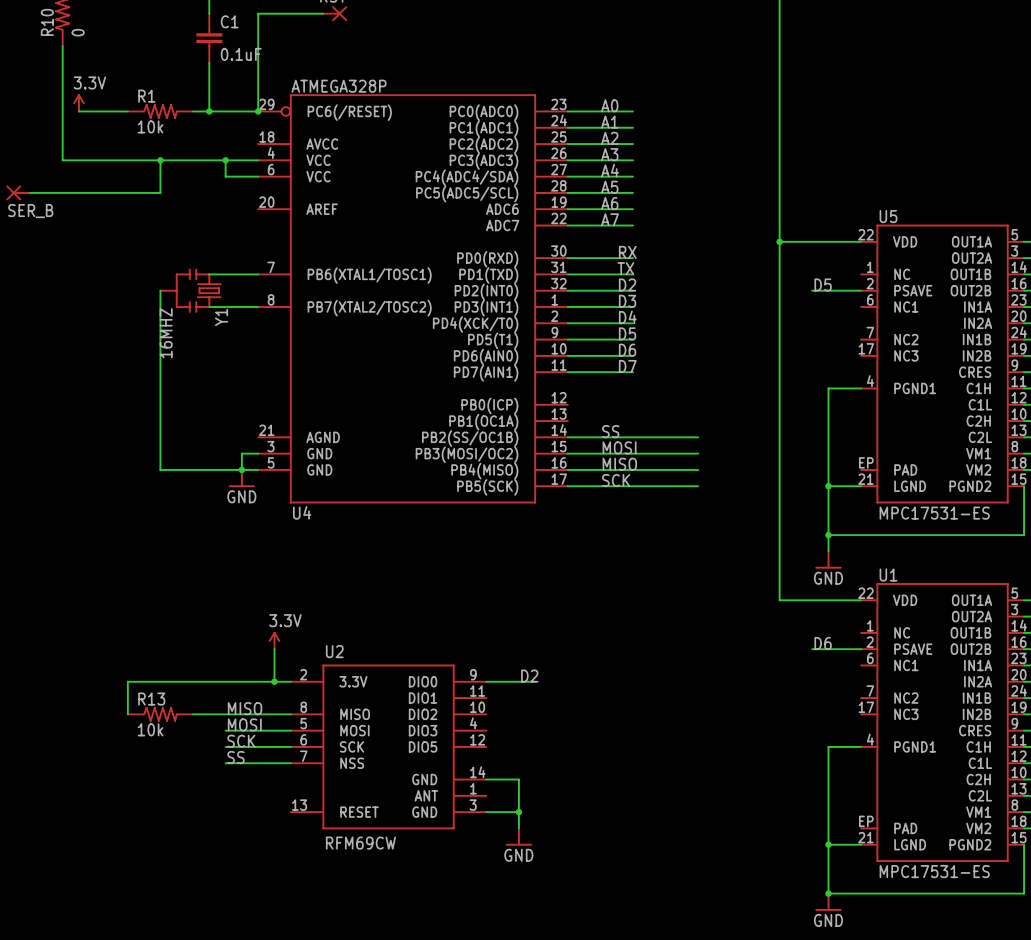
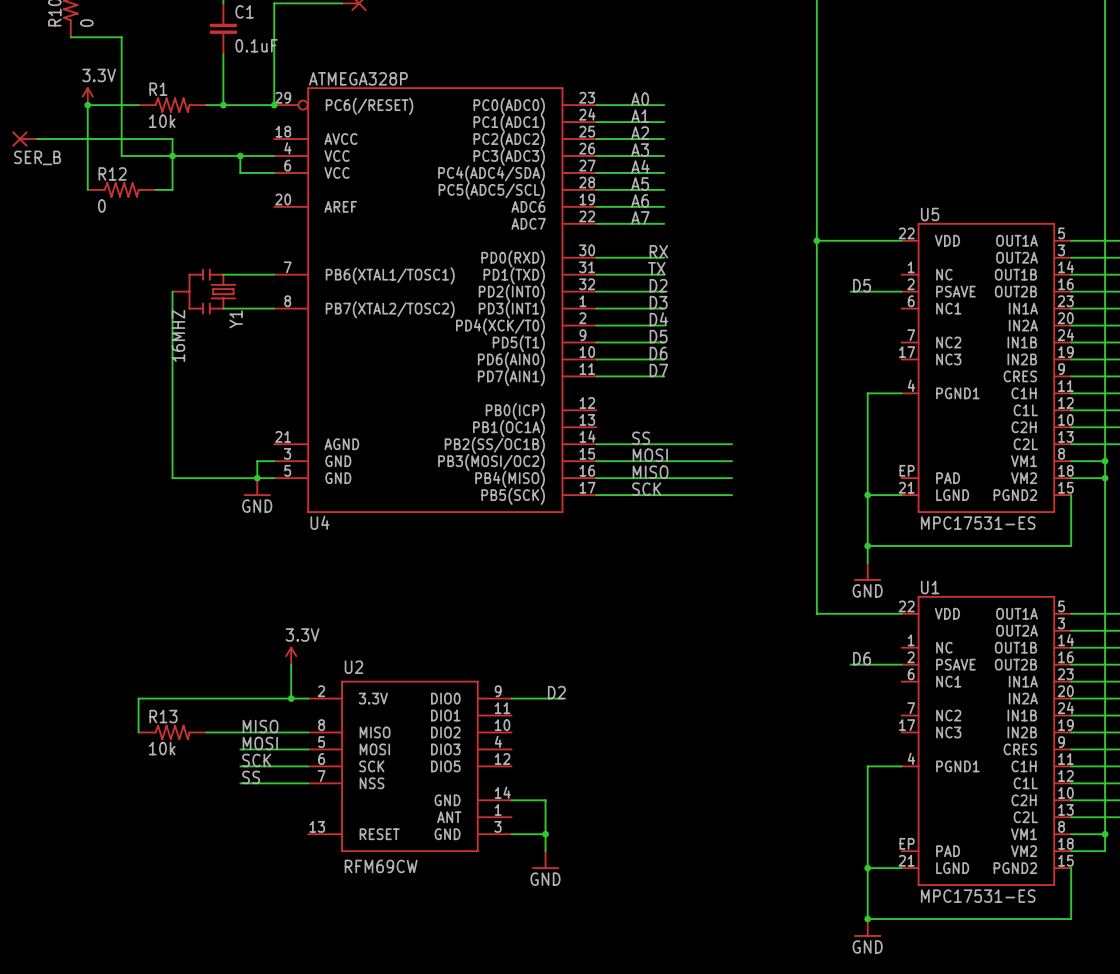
wire: (62, 46) (62, 160) (111, 160) -> (70, 37) (121, 37) (121, 155)
wire: none -> (87, 105) (87, 189)
junction: none -> (87, 105)
wire: none -> (36, 139) (172, 139) (172, 155)
SER_B position: (18, 192) -> (24, 139)
wire: (30, 192) (144, 192) -> none
R12: none -> 0 (121, 189)

